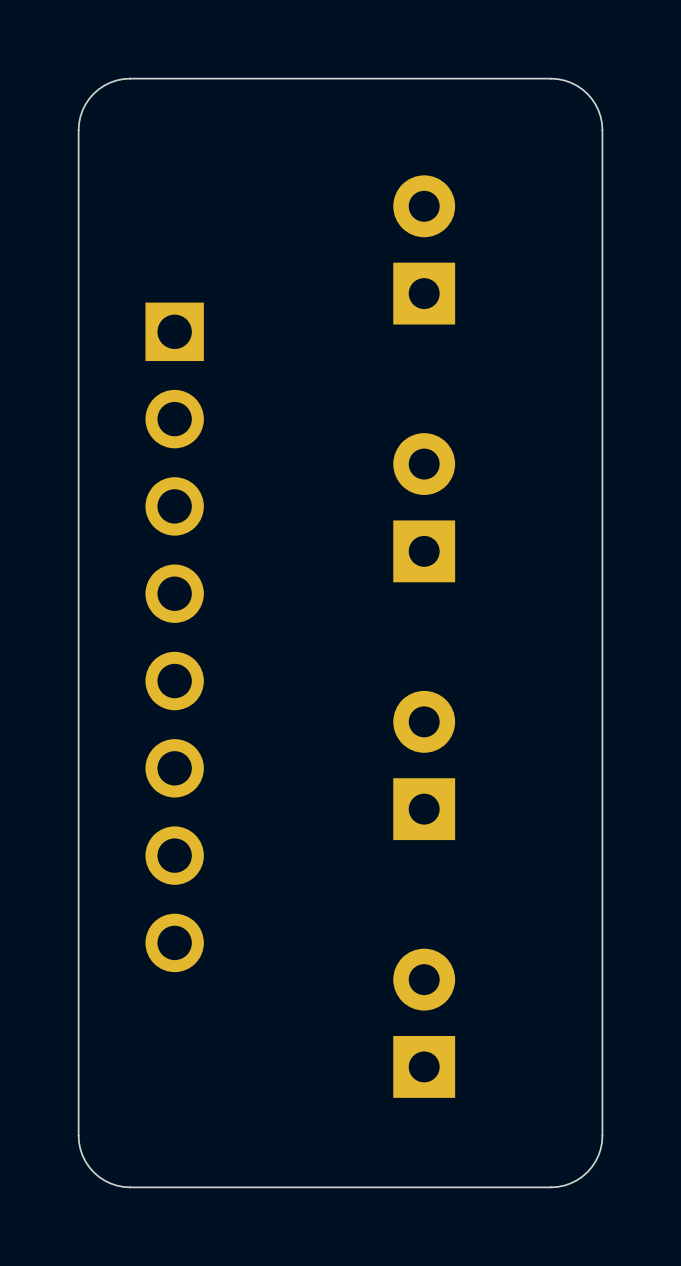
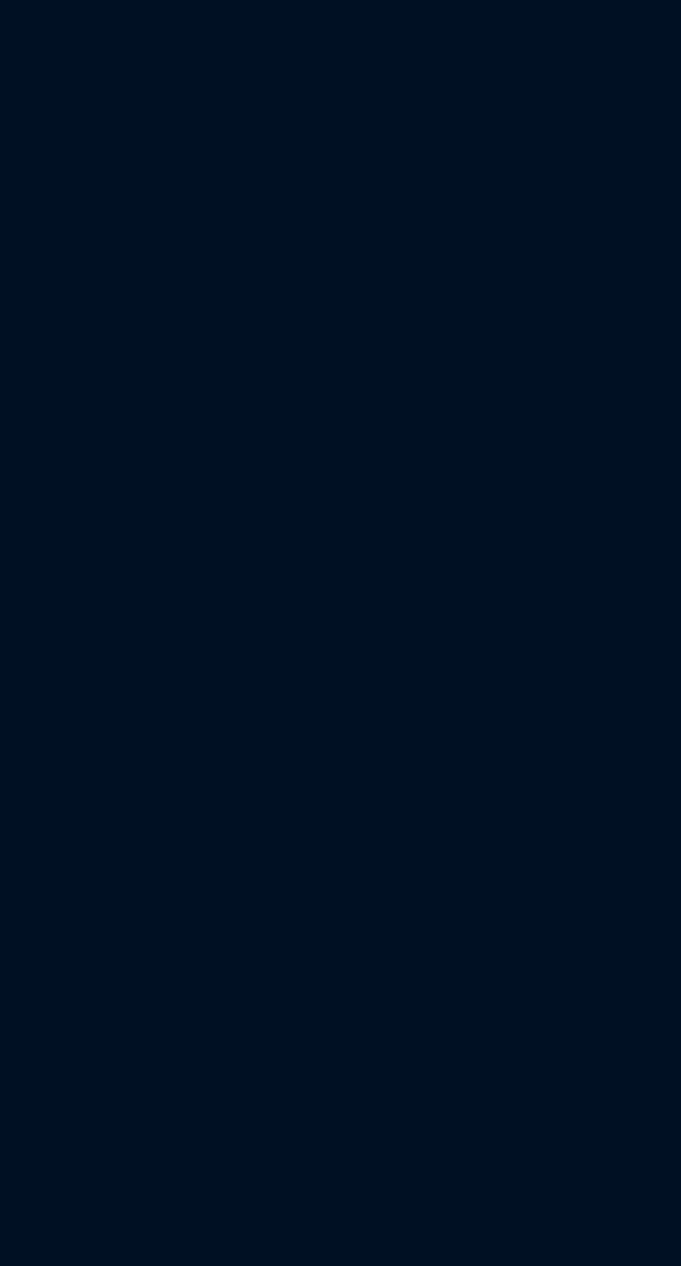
board edge: (550, 78) (123, 79) (110, 82) (98, 89) (89, 98) (82, 110) (78, 130) (78, 1135) (80, 1149) (85, 1161) (93, 1172) (110, 1183) (130, 1187) (550, 1187) (564, 1185) (582, 1176) (591, 1167) (598, 1155) (602, 1135) (602, 130) (598, 110) (587, 93) (570, 82) (550, 78) -> none
part: (424, 249) -> none
part: (424, 507) -> none
part: (174, 637) -> none
part: (424, 765) -> none
part: (424, 1023) -> none

